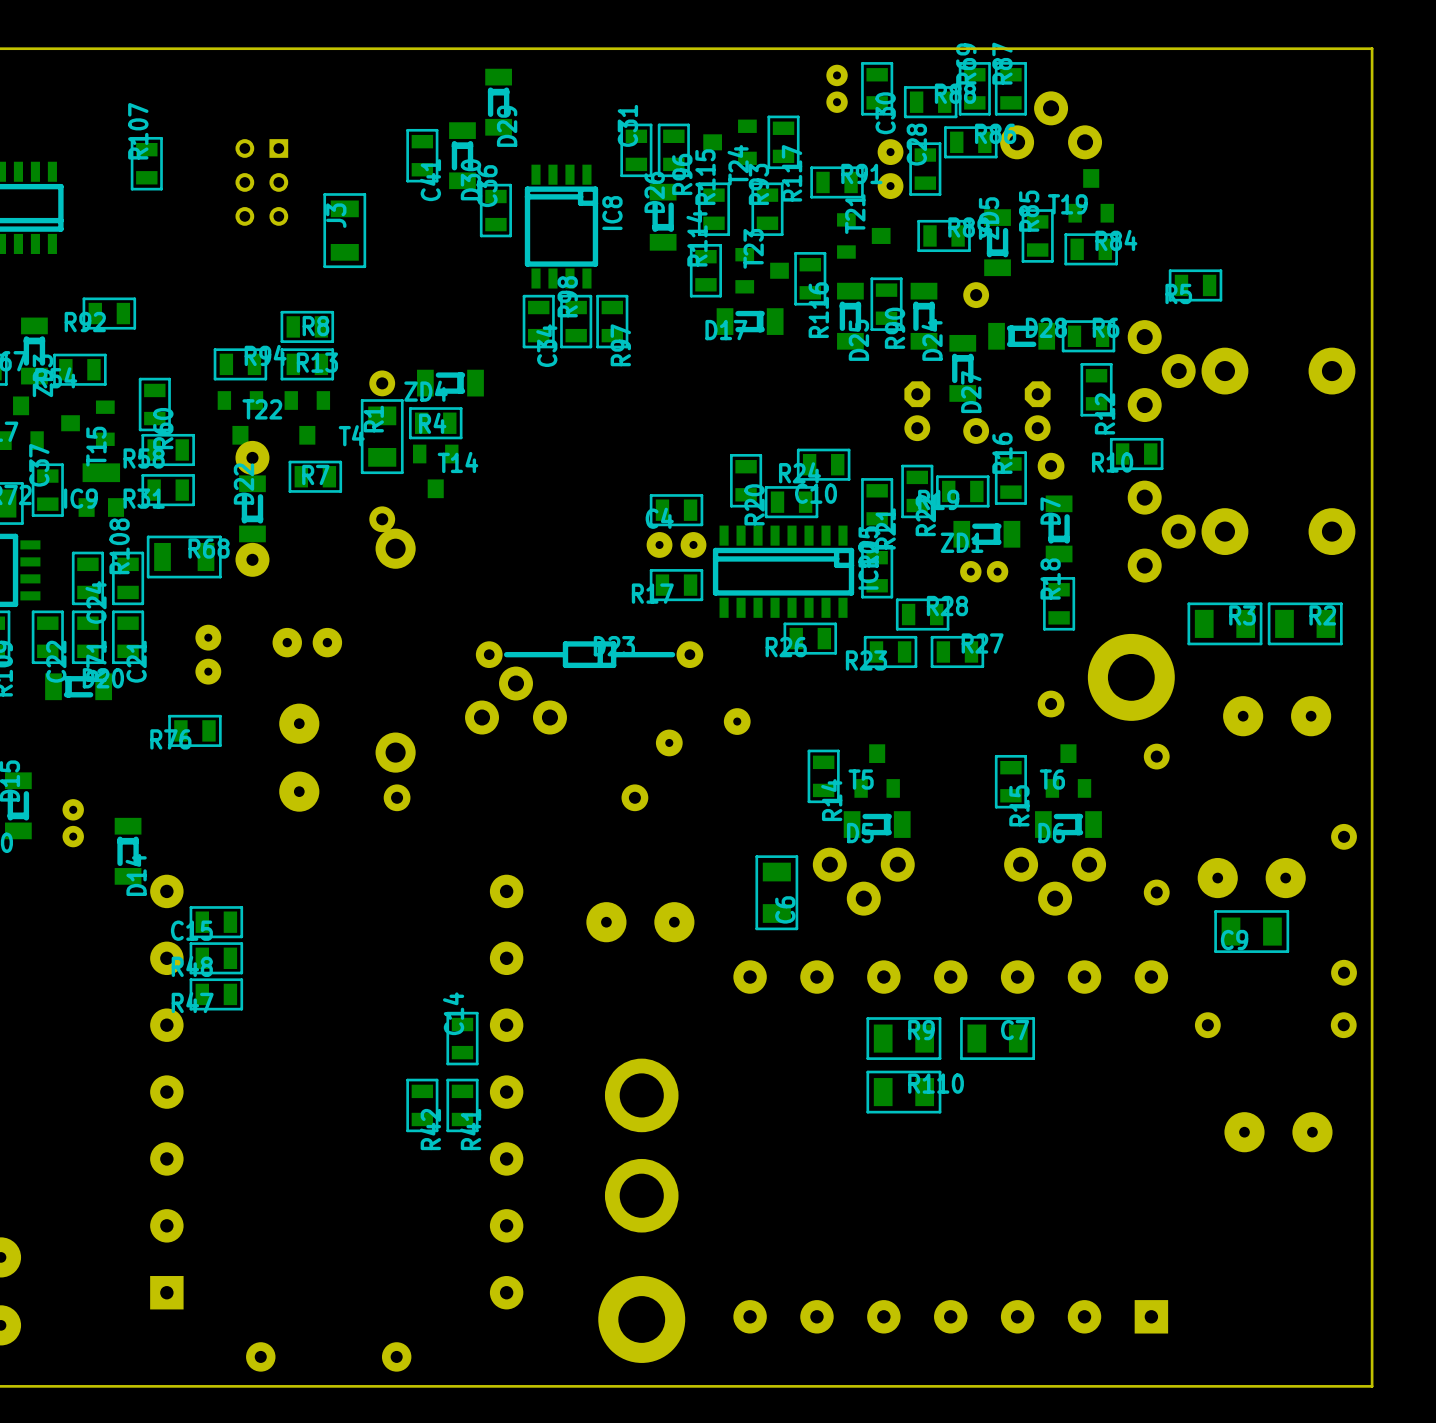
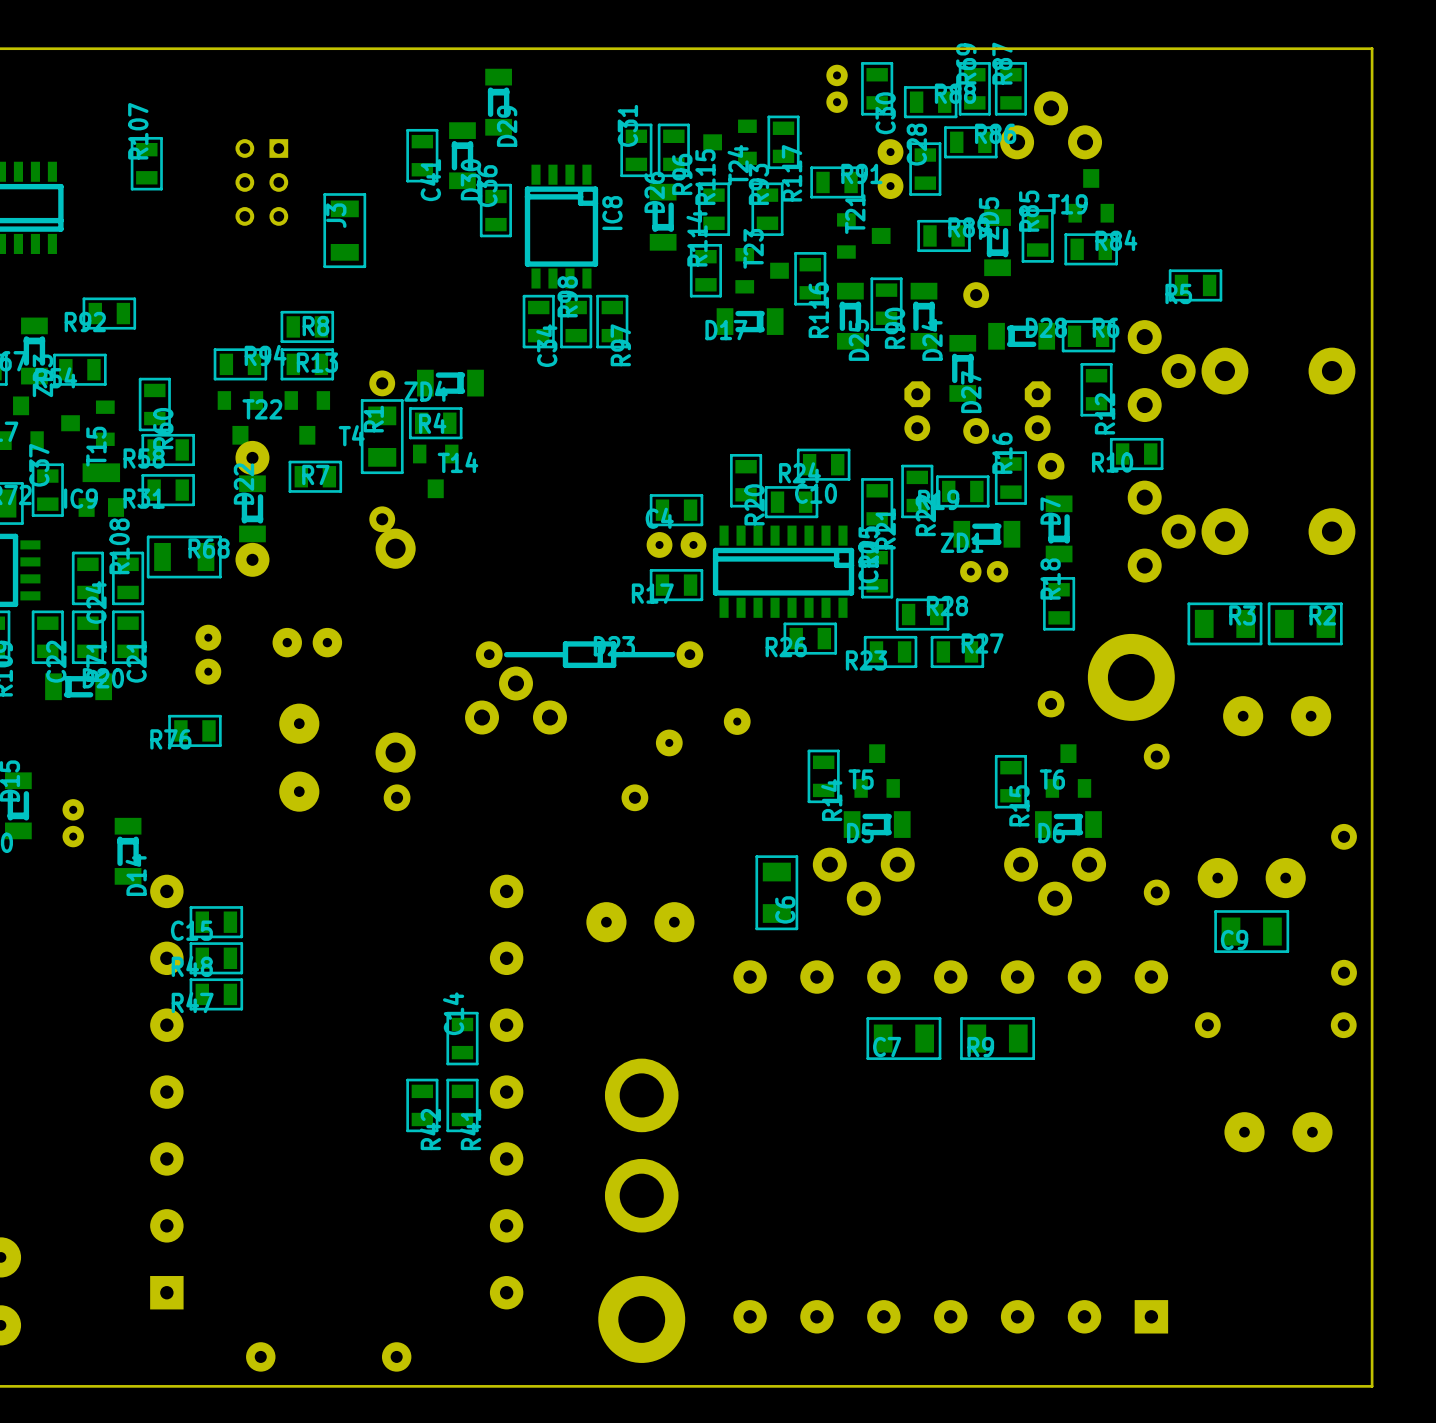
R9 name: R9 (921, 1030) -> C7 (887, 1047)
C7 name: C7 (1015, 1030) -> R9 (980, 1047)
R110: (903, 1092) -> none

